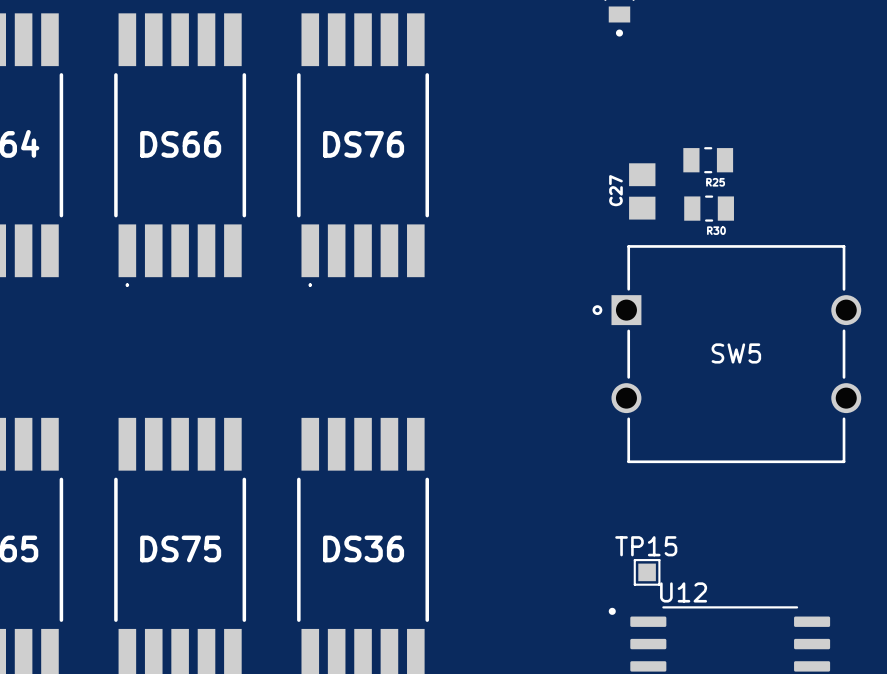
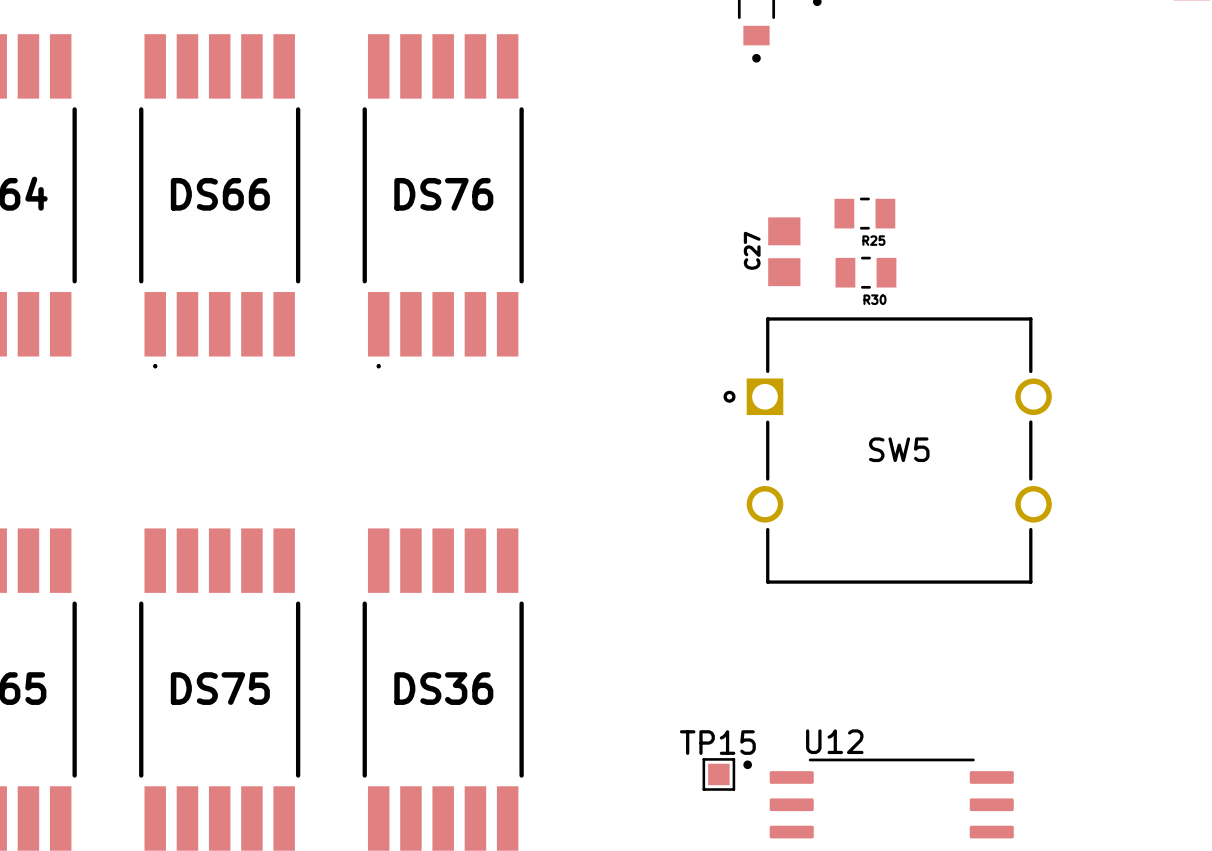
TP15 position: (647, 572) -> (718, 774)

